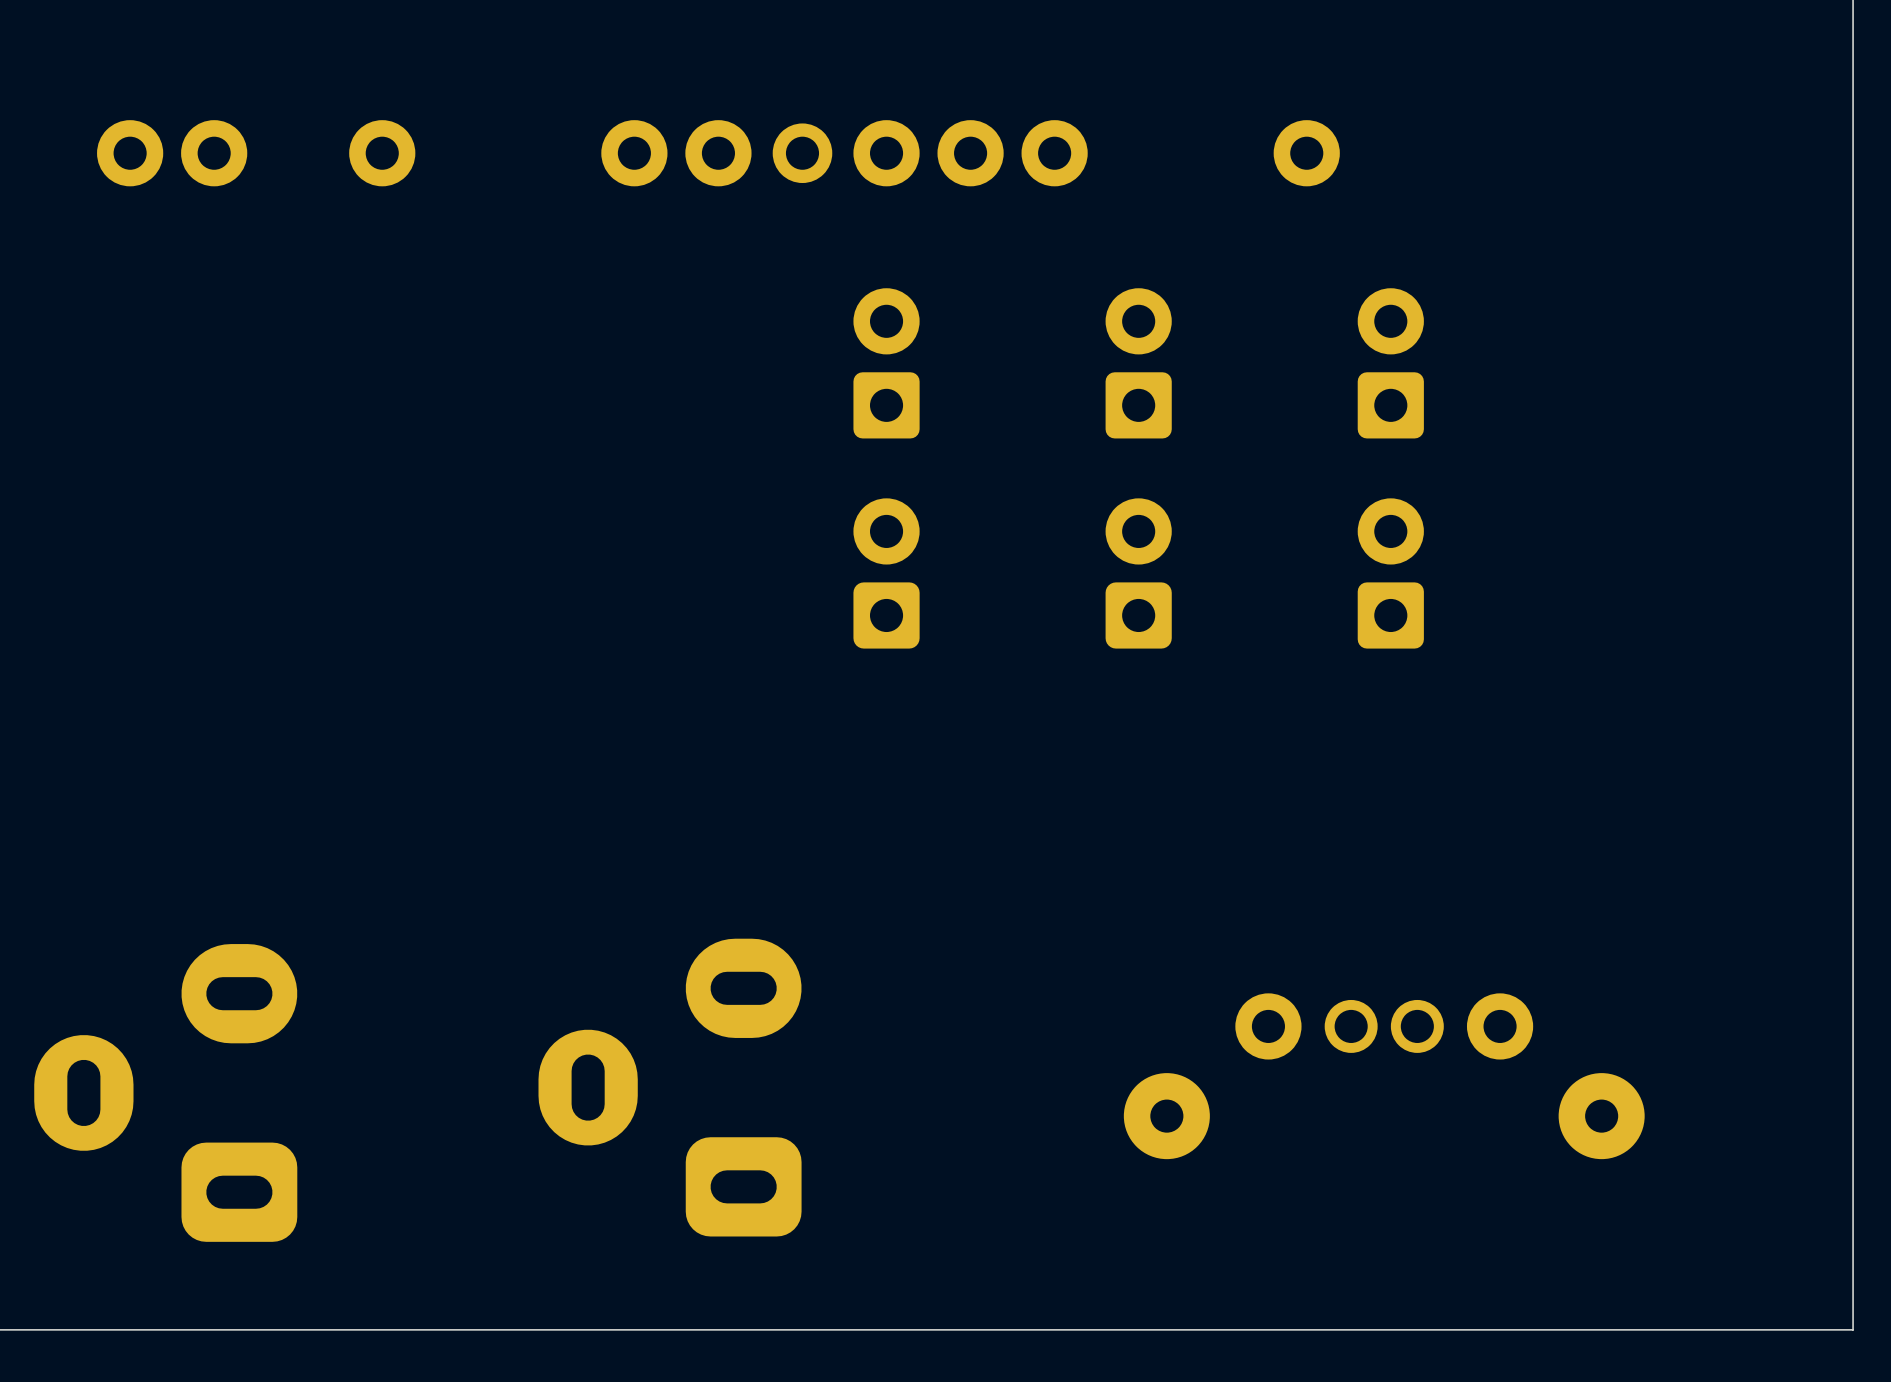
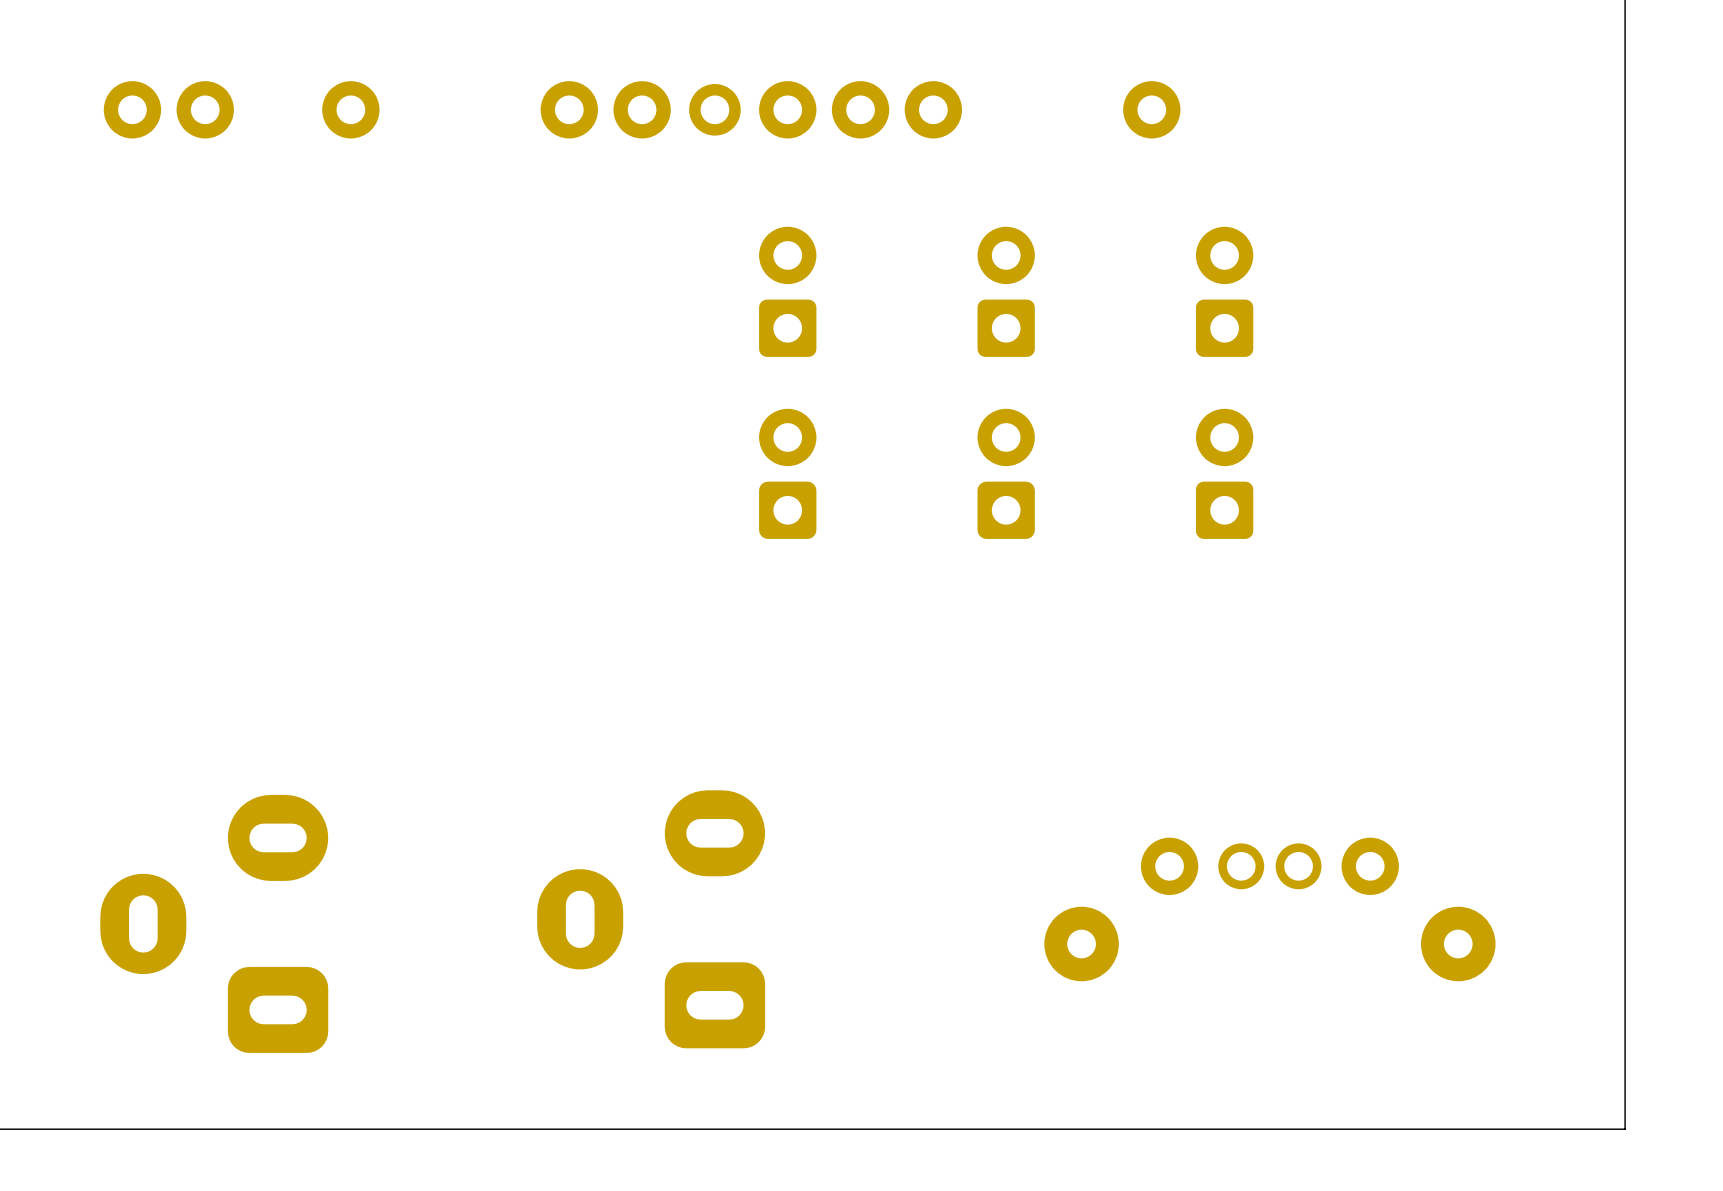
part position: (1384, 1076) -> (1269, 909)
part position: (670, 1087) -> (651, 919)
part position: (165, 1092) -> (214, 923)

